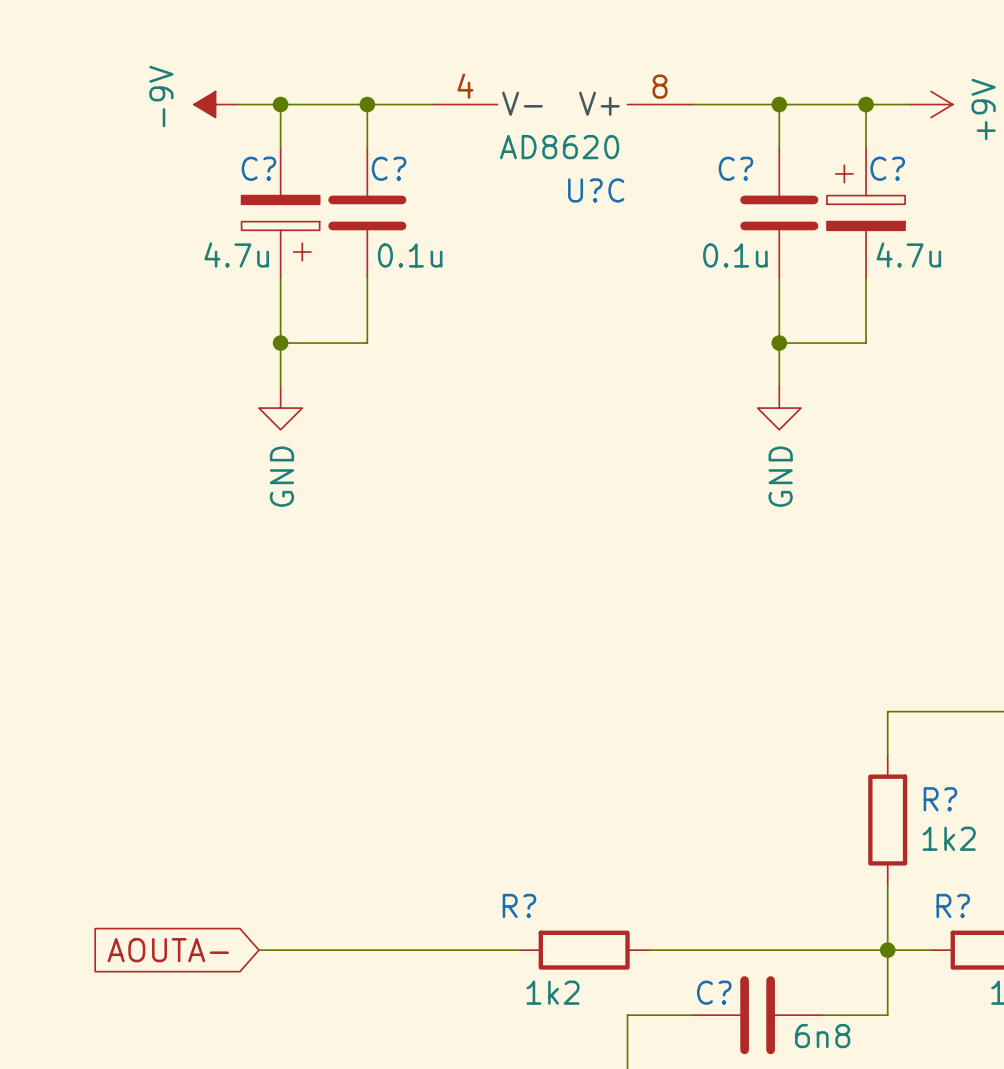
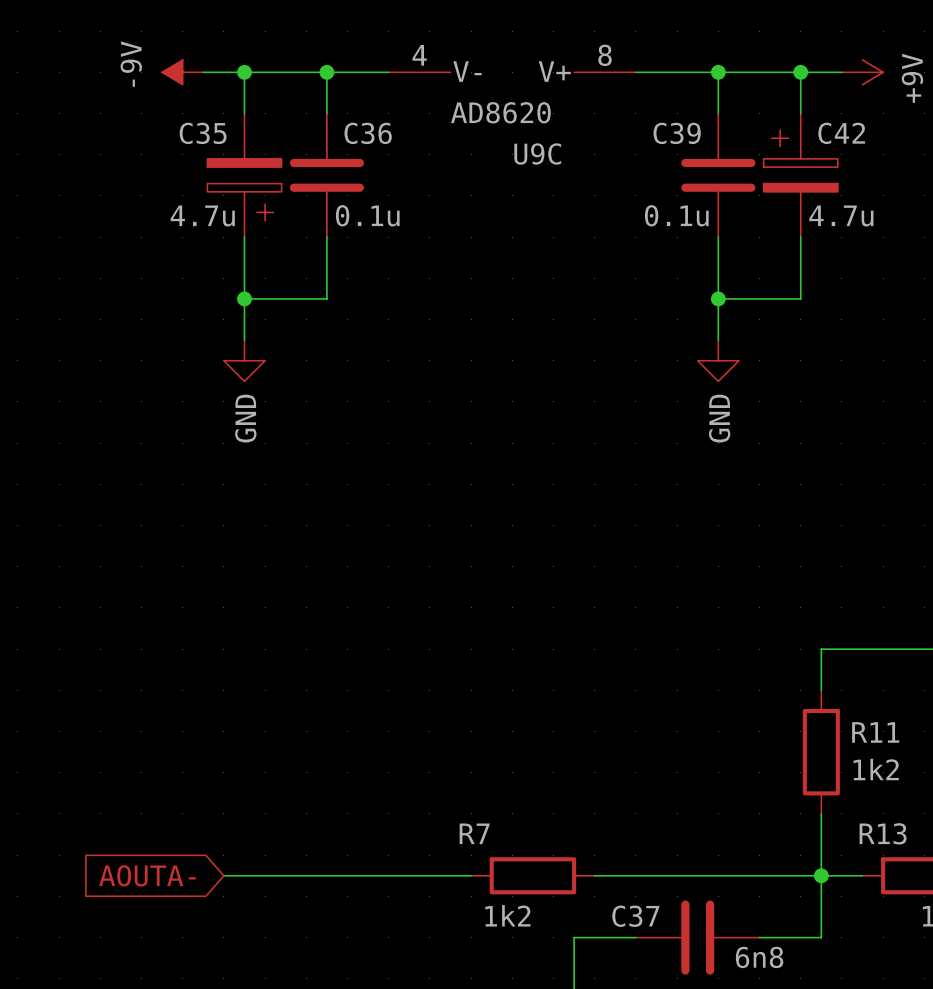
C? name: C? (258, 168) -> C35 (203, 133)
C? name: C? (389, 168) -> C36 (368, 133)
C? name: C? (735, 168) -> C39 (677, 133)
C? name: C? (887, 168) -> C42 (841, 133)
U?C name: U?C (596, 190) -> U9C (537, 153)
R? name: R? (940, 799) -> R11 (875, 732)
R? name: R? (519, 905) -> R7 (474, 833)
R? name: R? (953, 905) -> R13 (883, 833)
C? name: C? (714, 992) -> C37 (635, 916)

